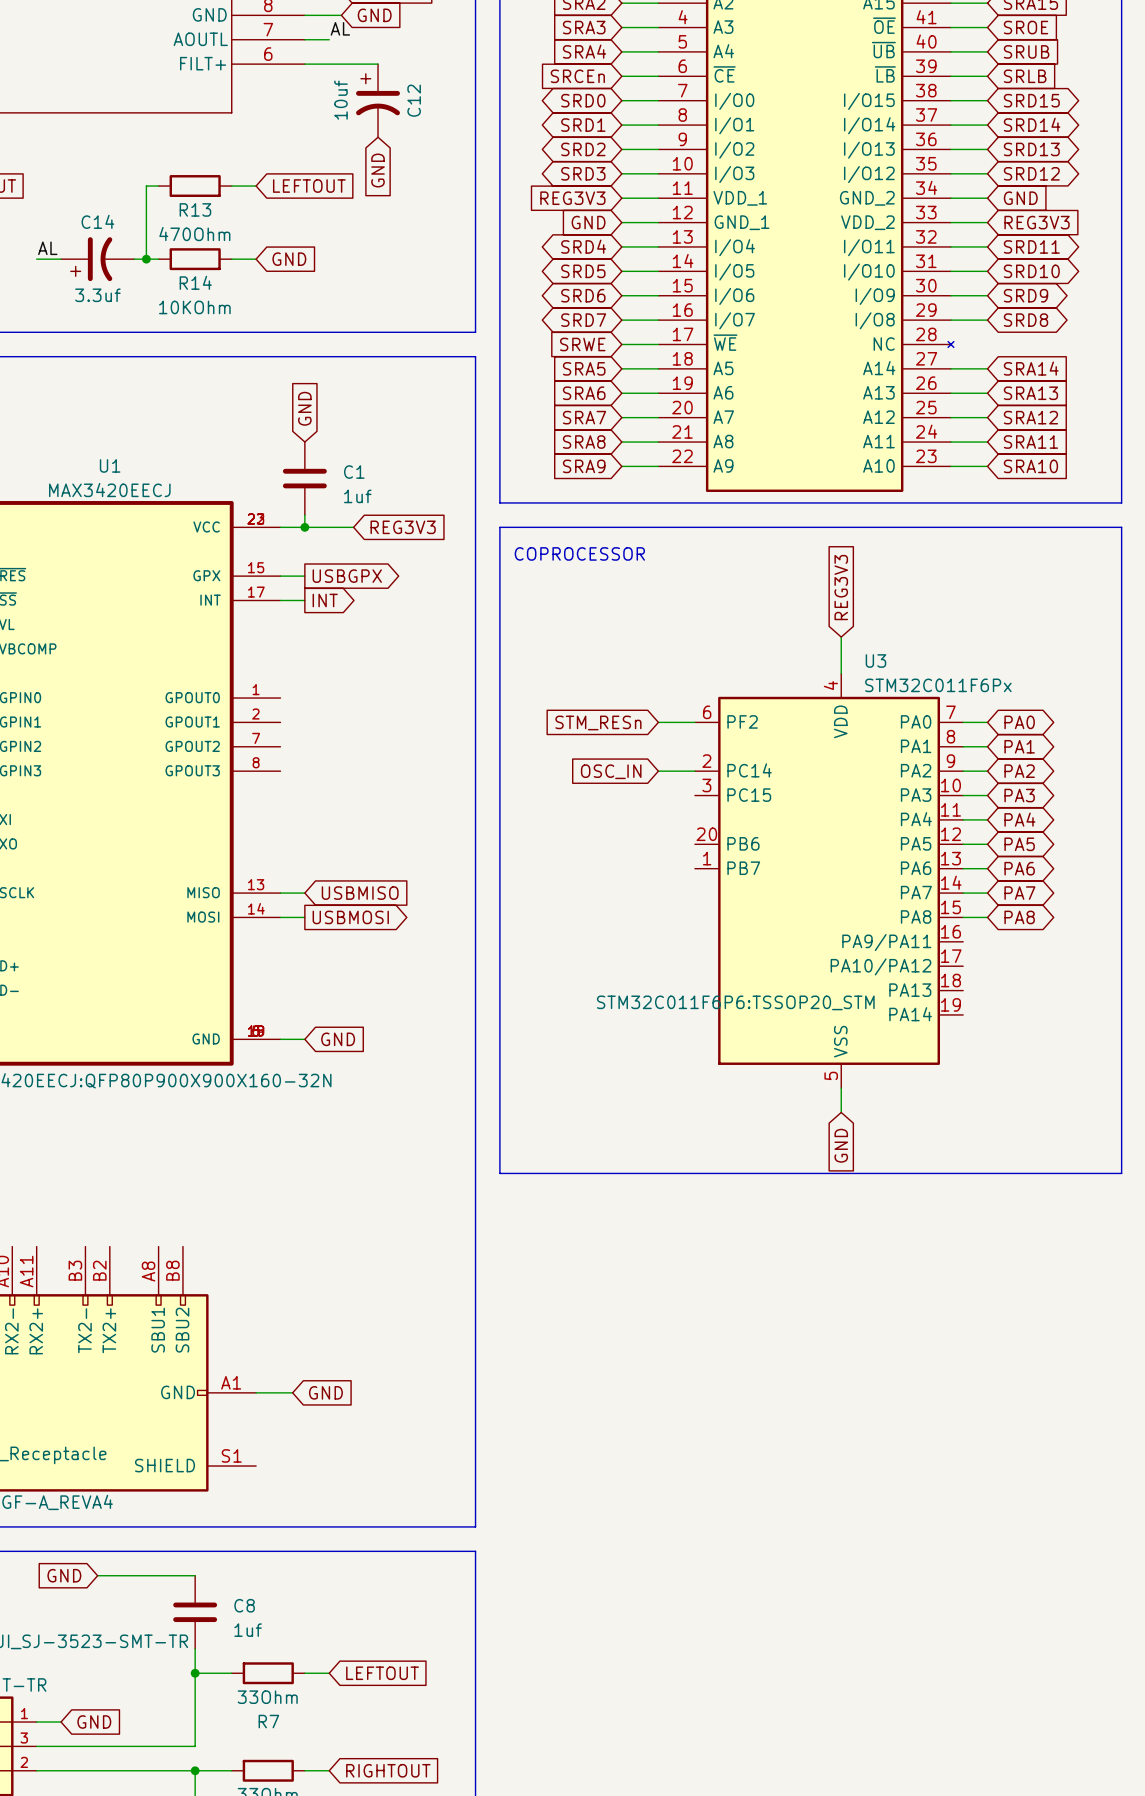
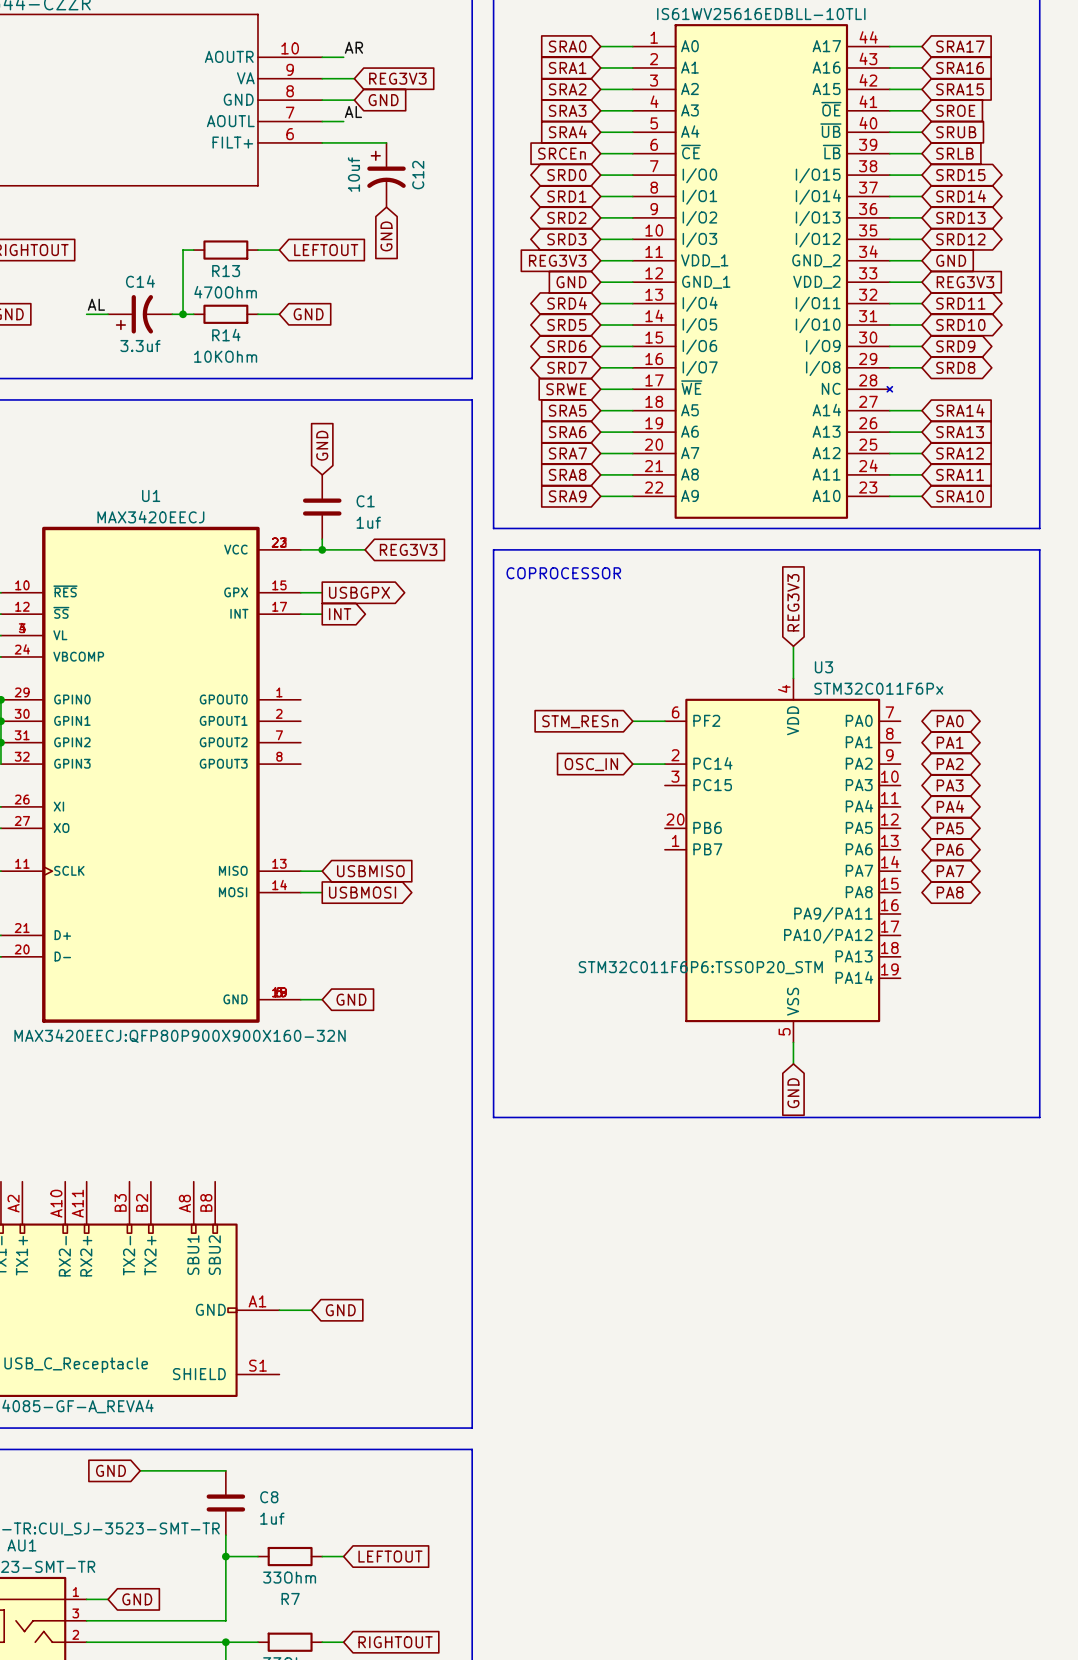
wire: (963, 722) (987, 722) -> none
wire: (963, 746) (987, 746) -> none
wire: (963, 771) (987, 771) -> none
wire: (963, 795) (987, 795) -> none
wire: (963, 819) (987, 819) -> none
wire: (963, 844) (987, 844) -> none
wire: (963, 868) (987, 868) -> none
wire: (963, 893) (987, 893) -> none
wire: (963, 917) (987, 917) -> none

